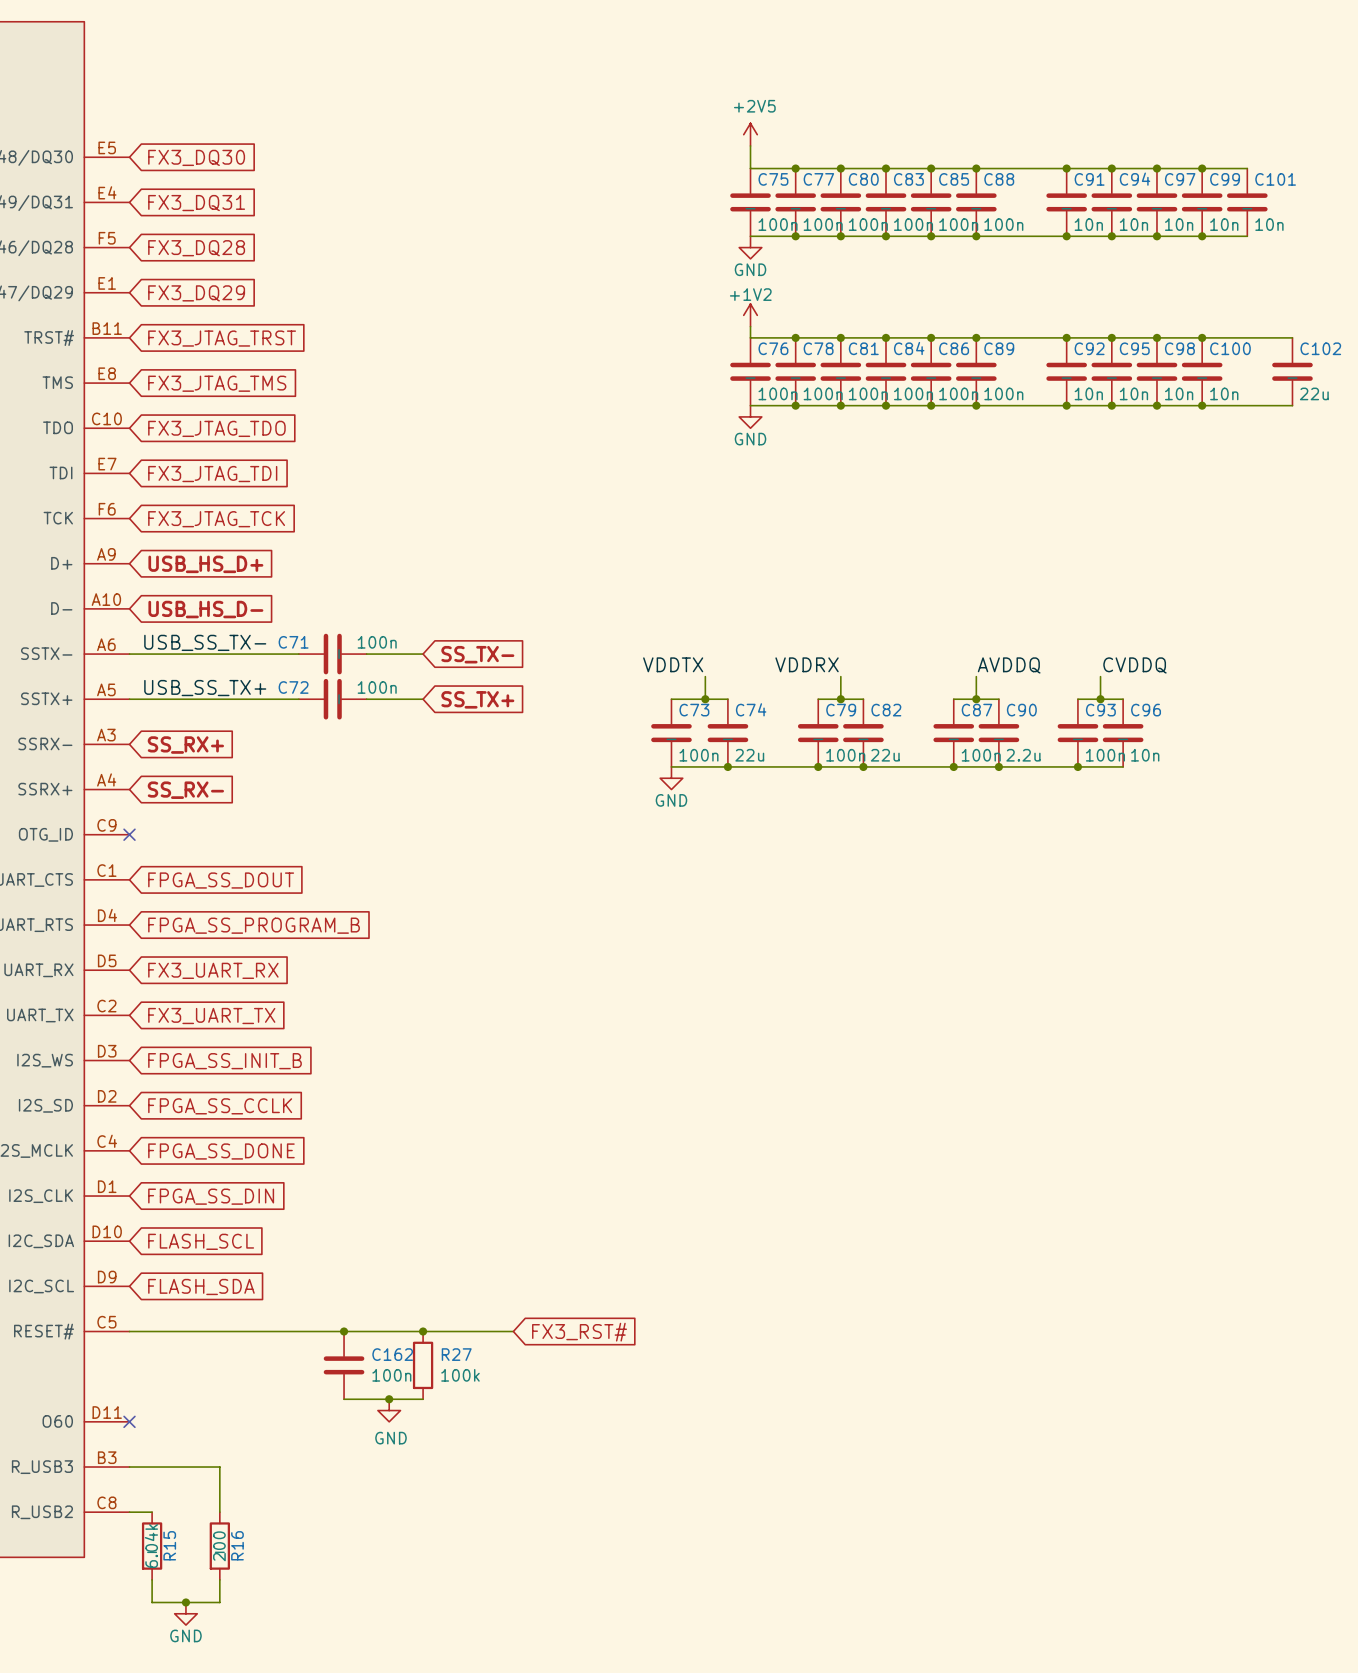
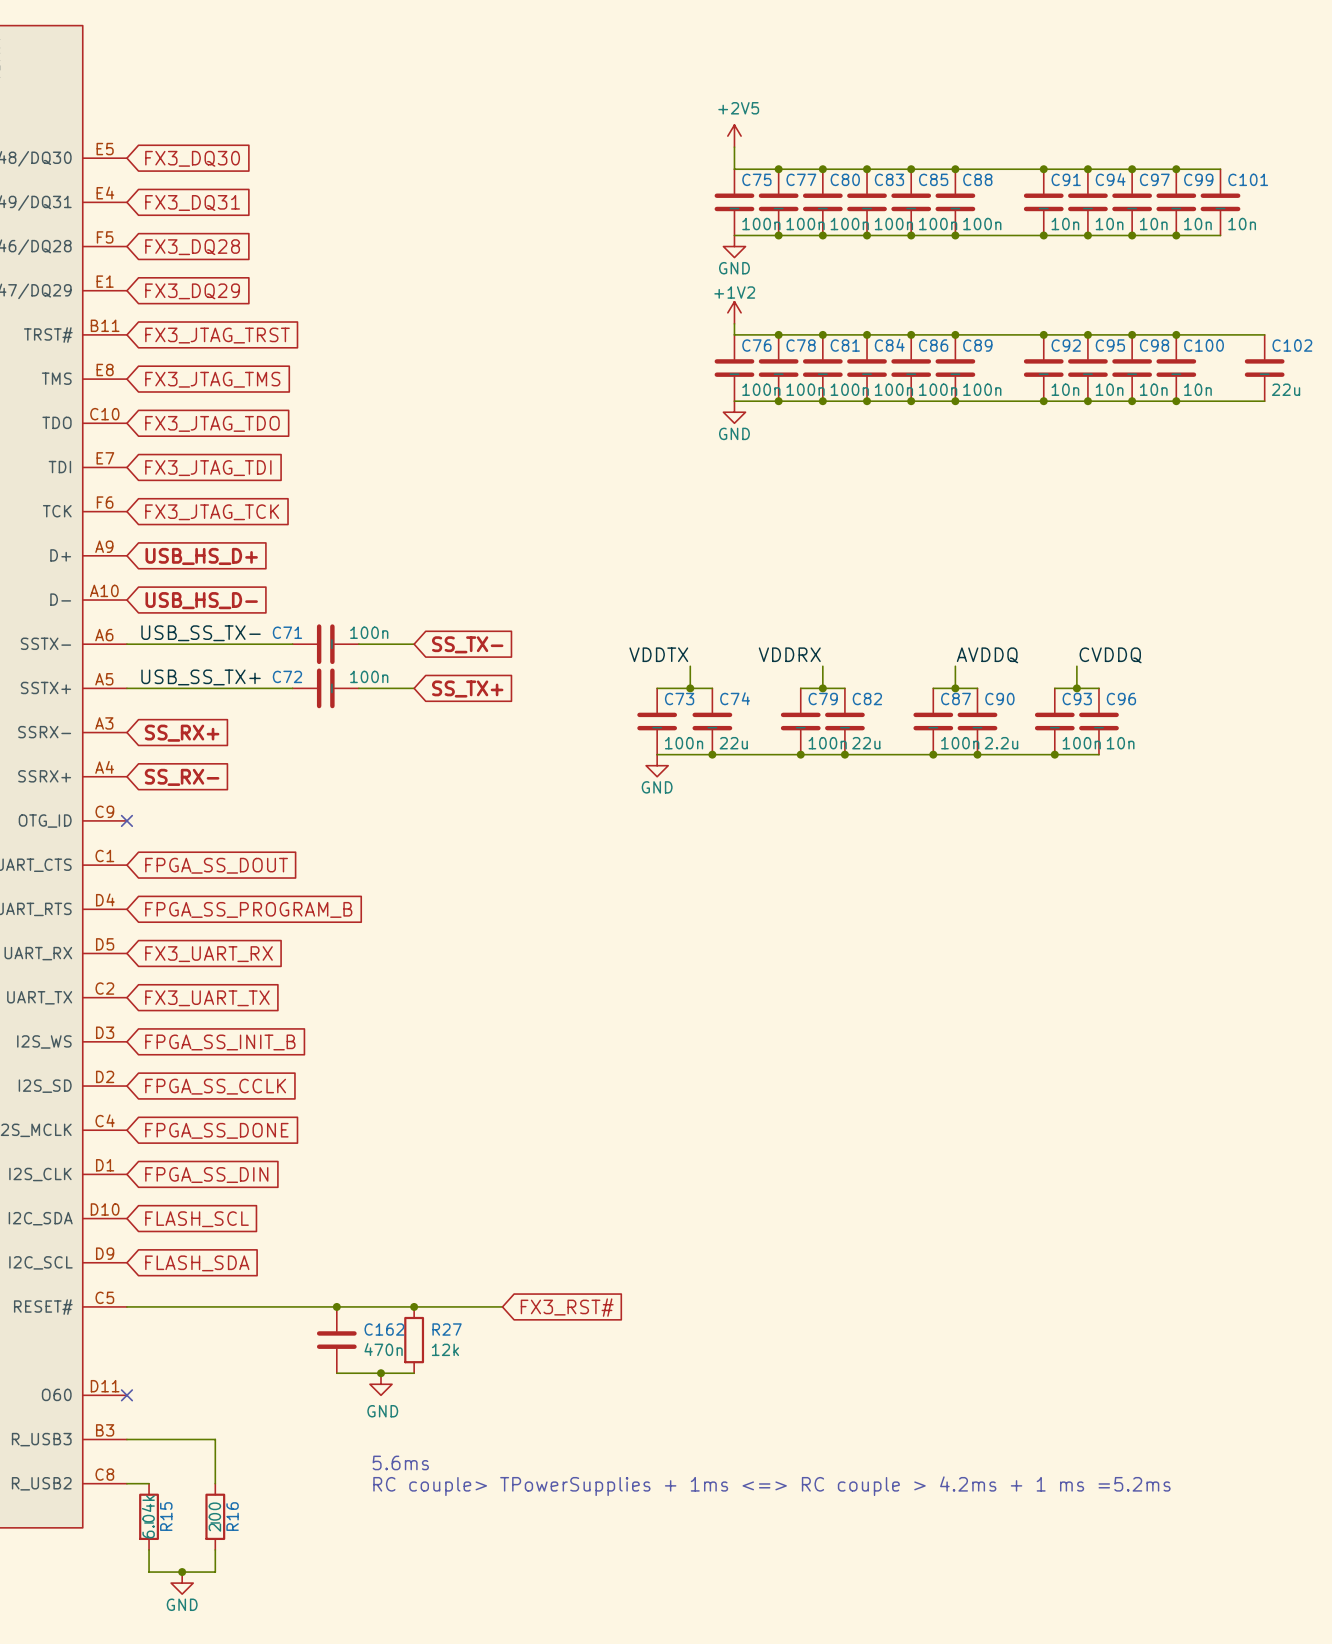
C162 value: 100n (391, 1375) -> 470n (383, 1349)
R27 value: 100k (460, 1375) -> 12k (445, 1349)
text: none -> 5.6ms (400, 1462)
text: none -> RC couple> TPowerSupplies + 1ms <=> RC couple > 4.2ms + 1 ms =5.2ms (771, 1486)

